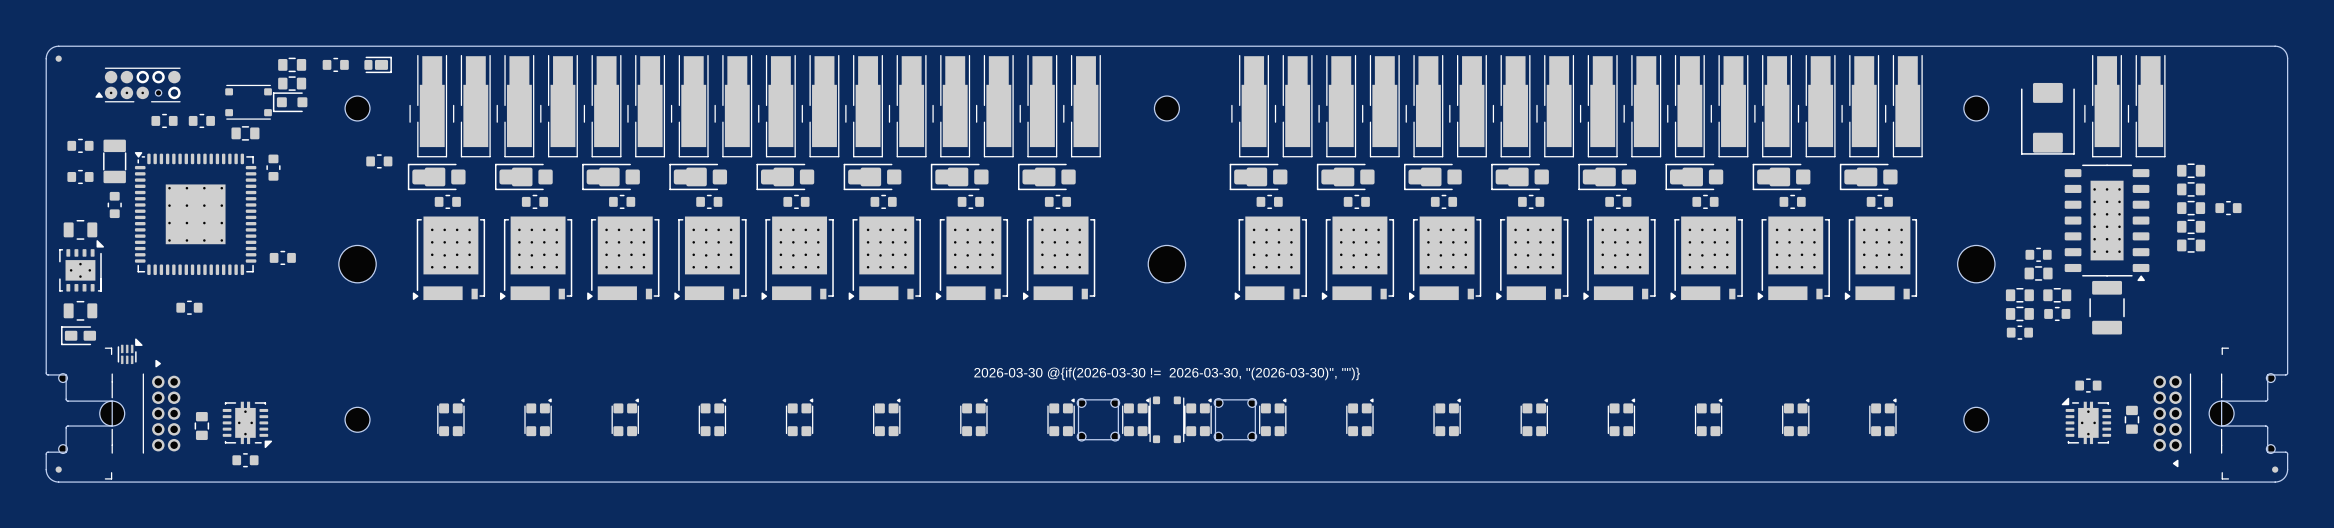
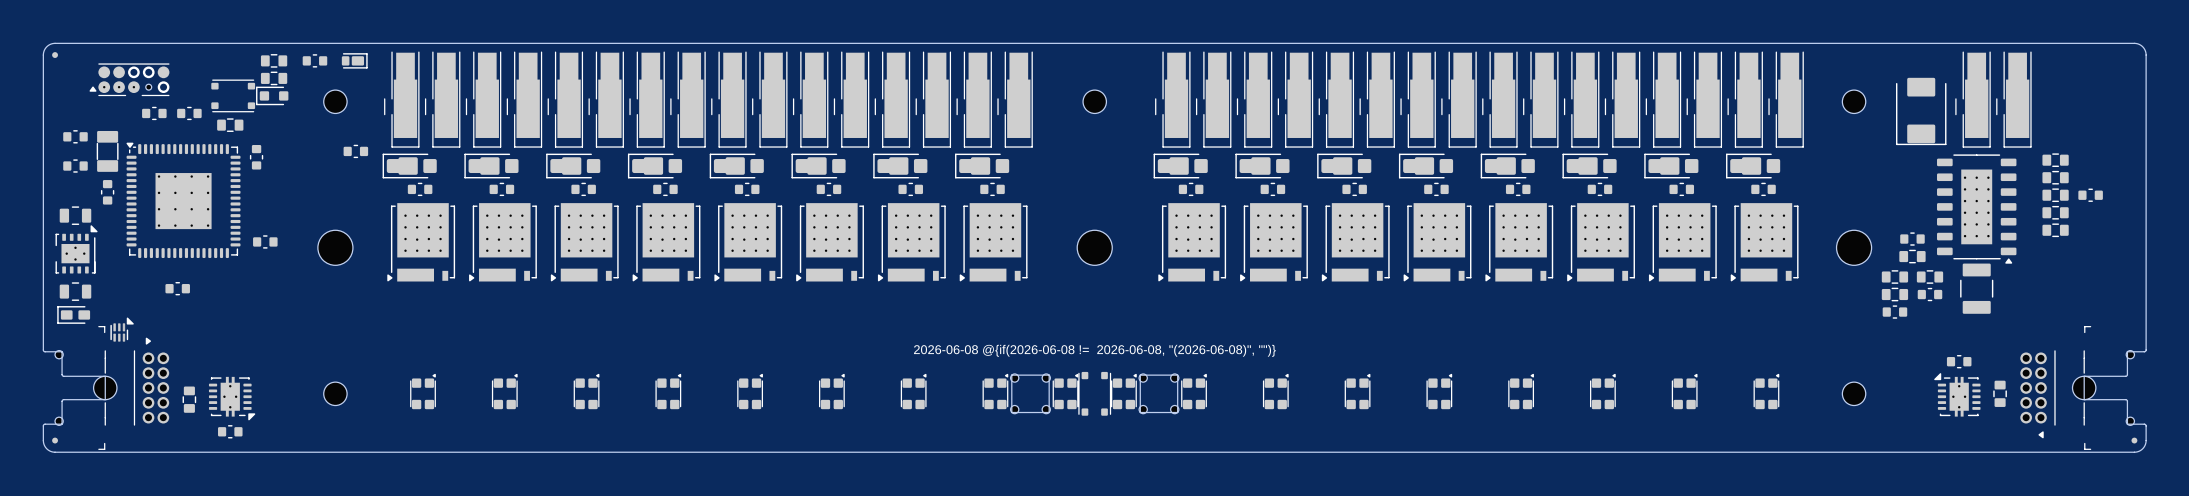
drawing shape: [974, 367, 1360, 381] -> [914, 344, 1276, 357]

